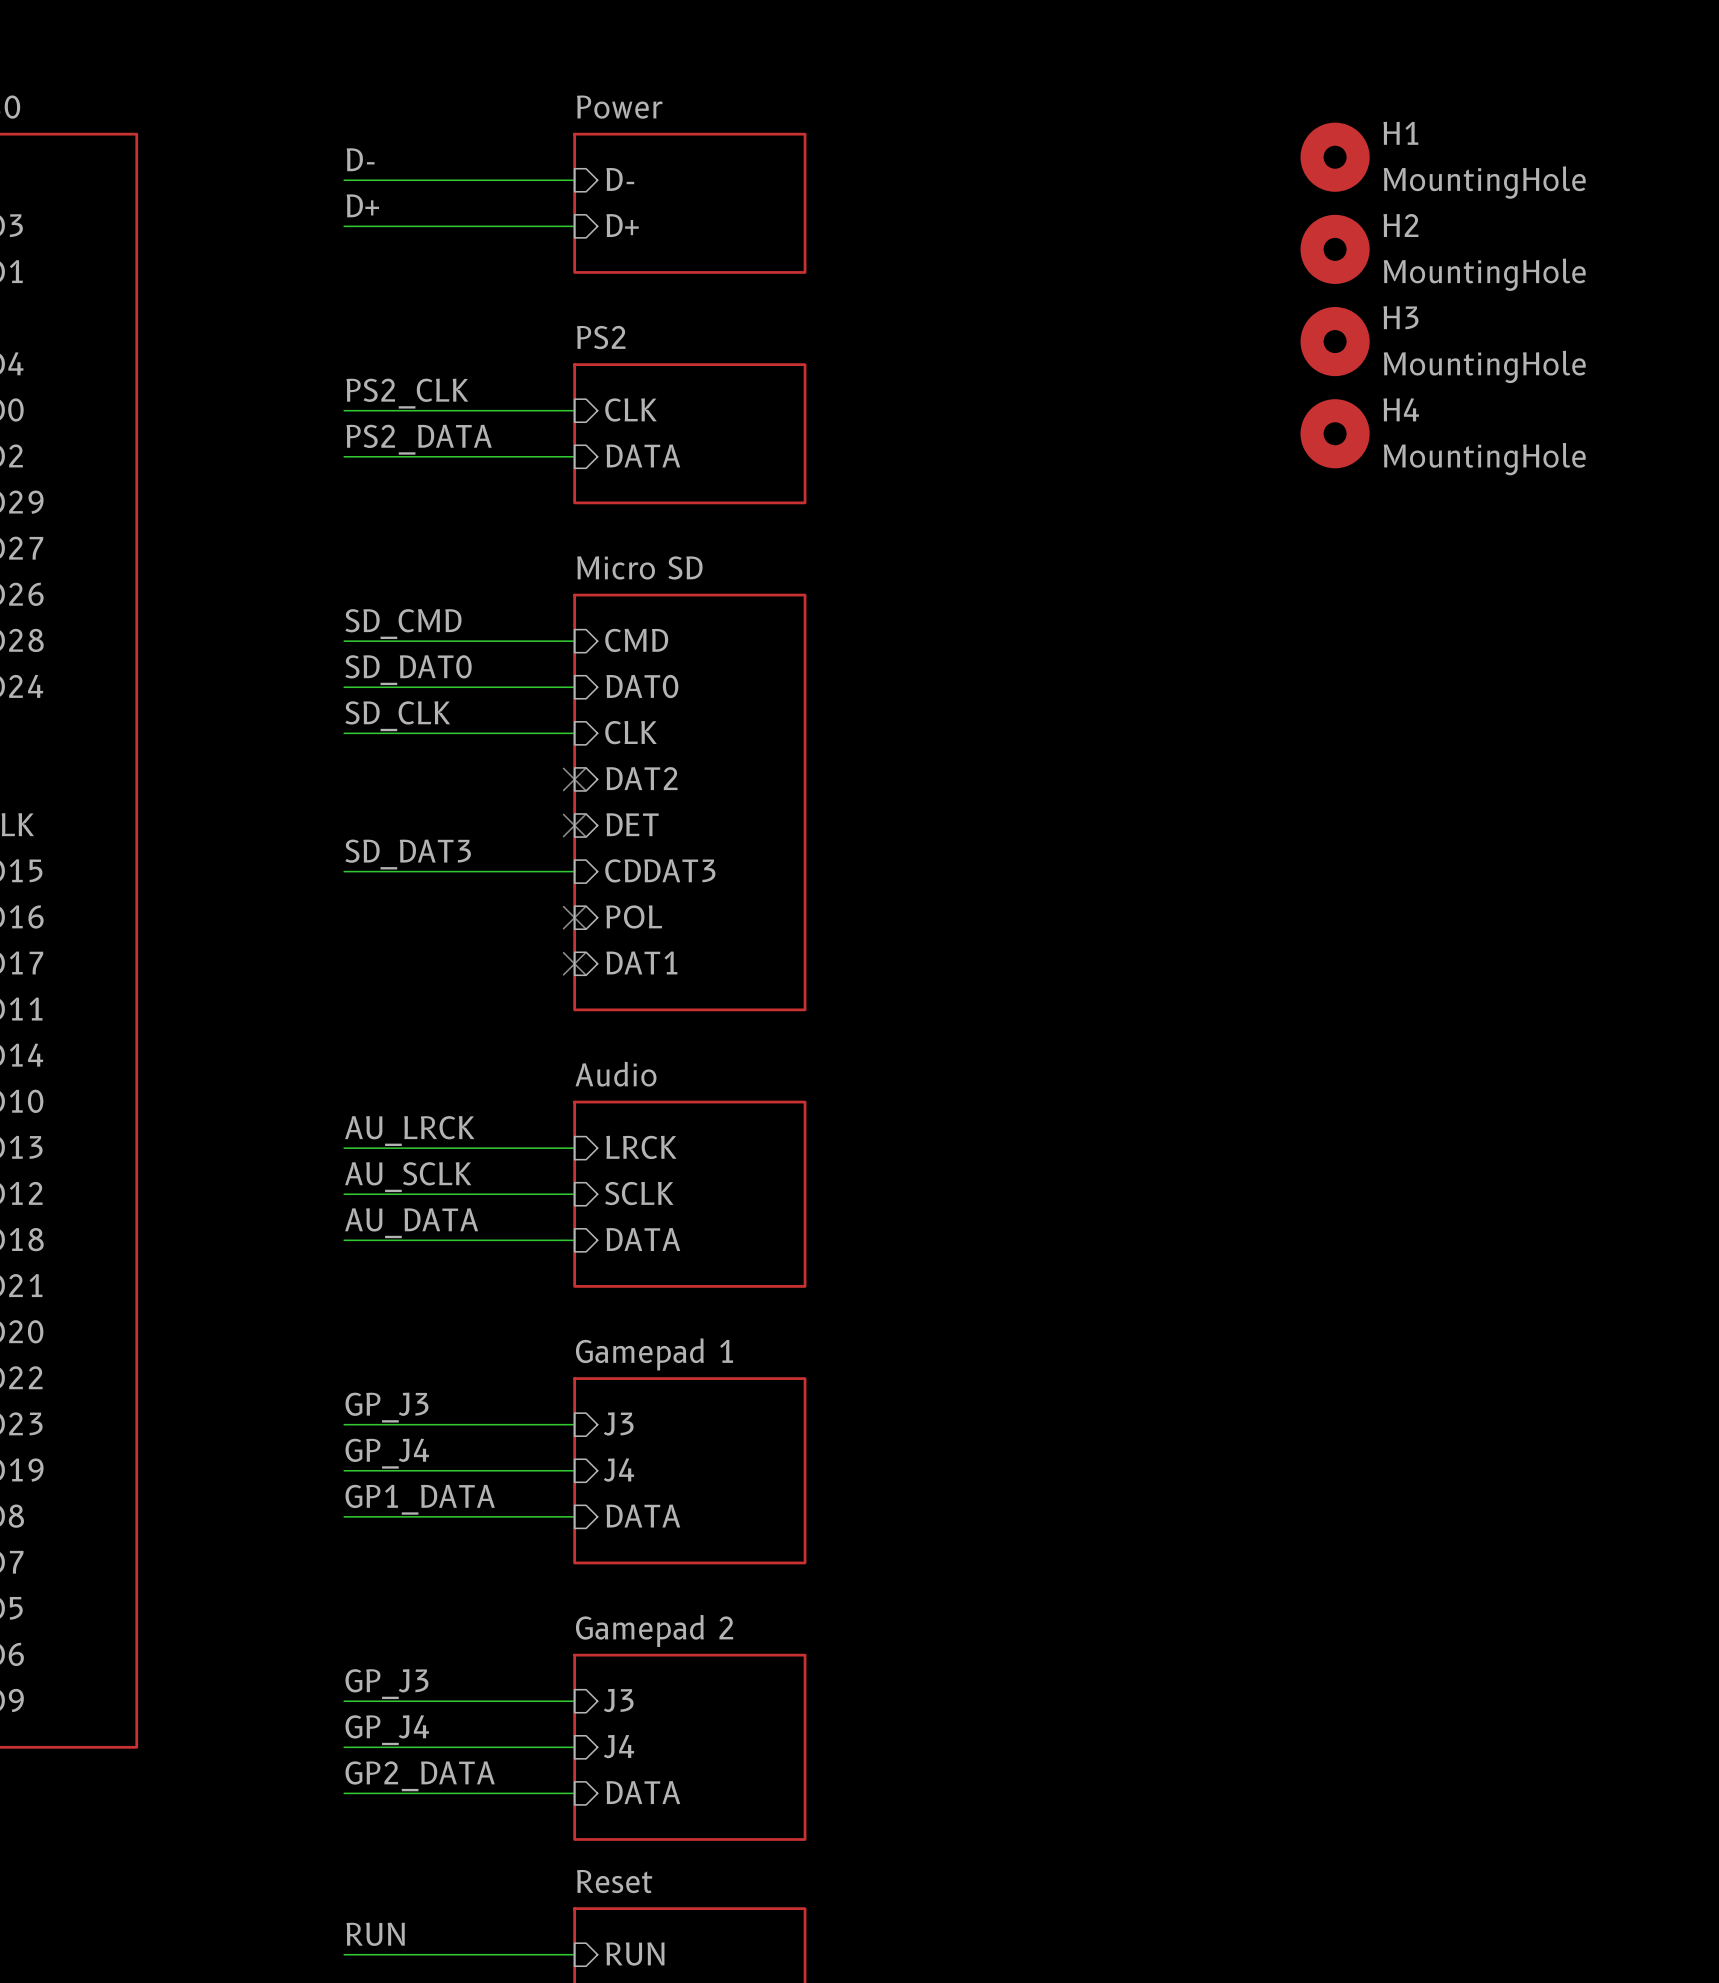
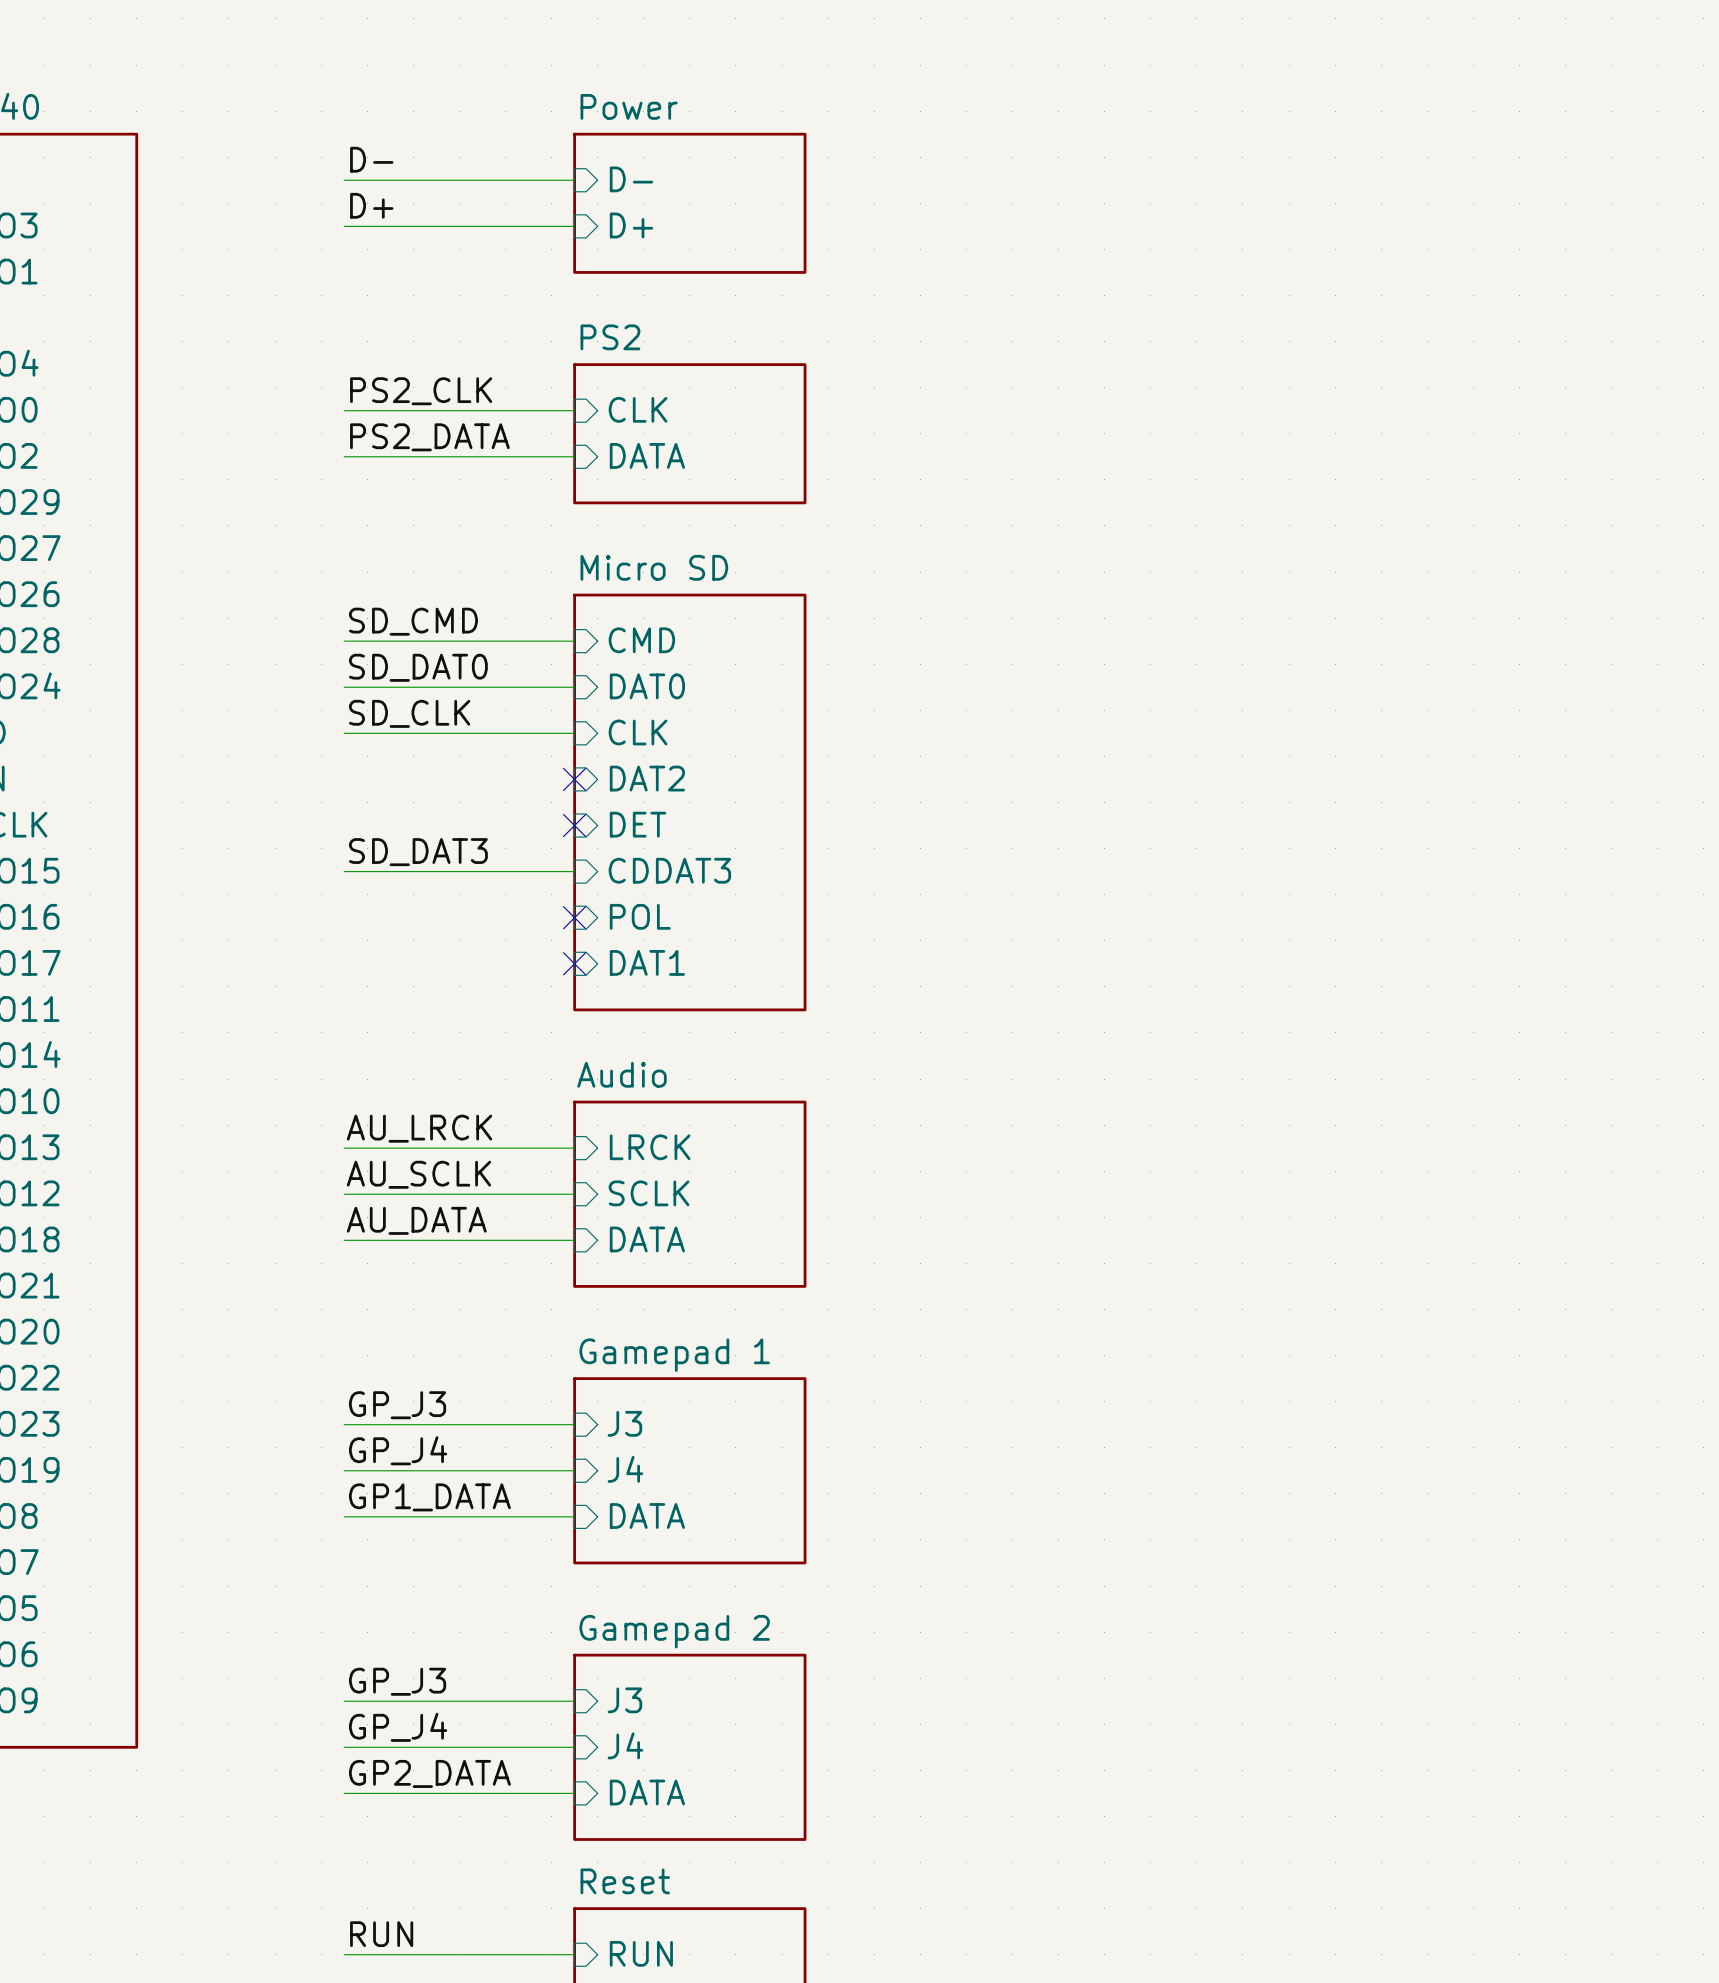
H1: MountingHole (1335, 157) -> none
H2: MountingHole (1335, 249) -> none
H3: MountingHole (1335, 341) -> none
H4: MountingHole (1335, 433) -> none

